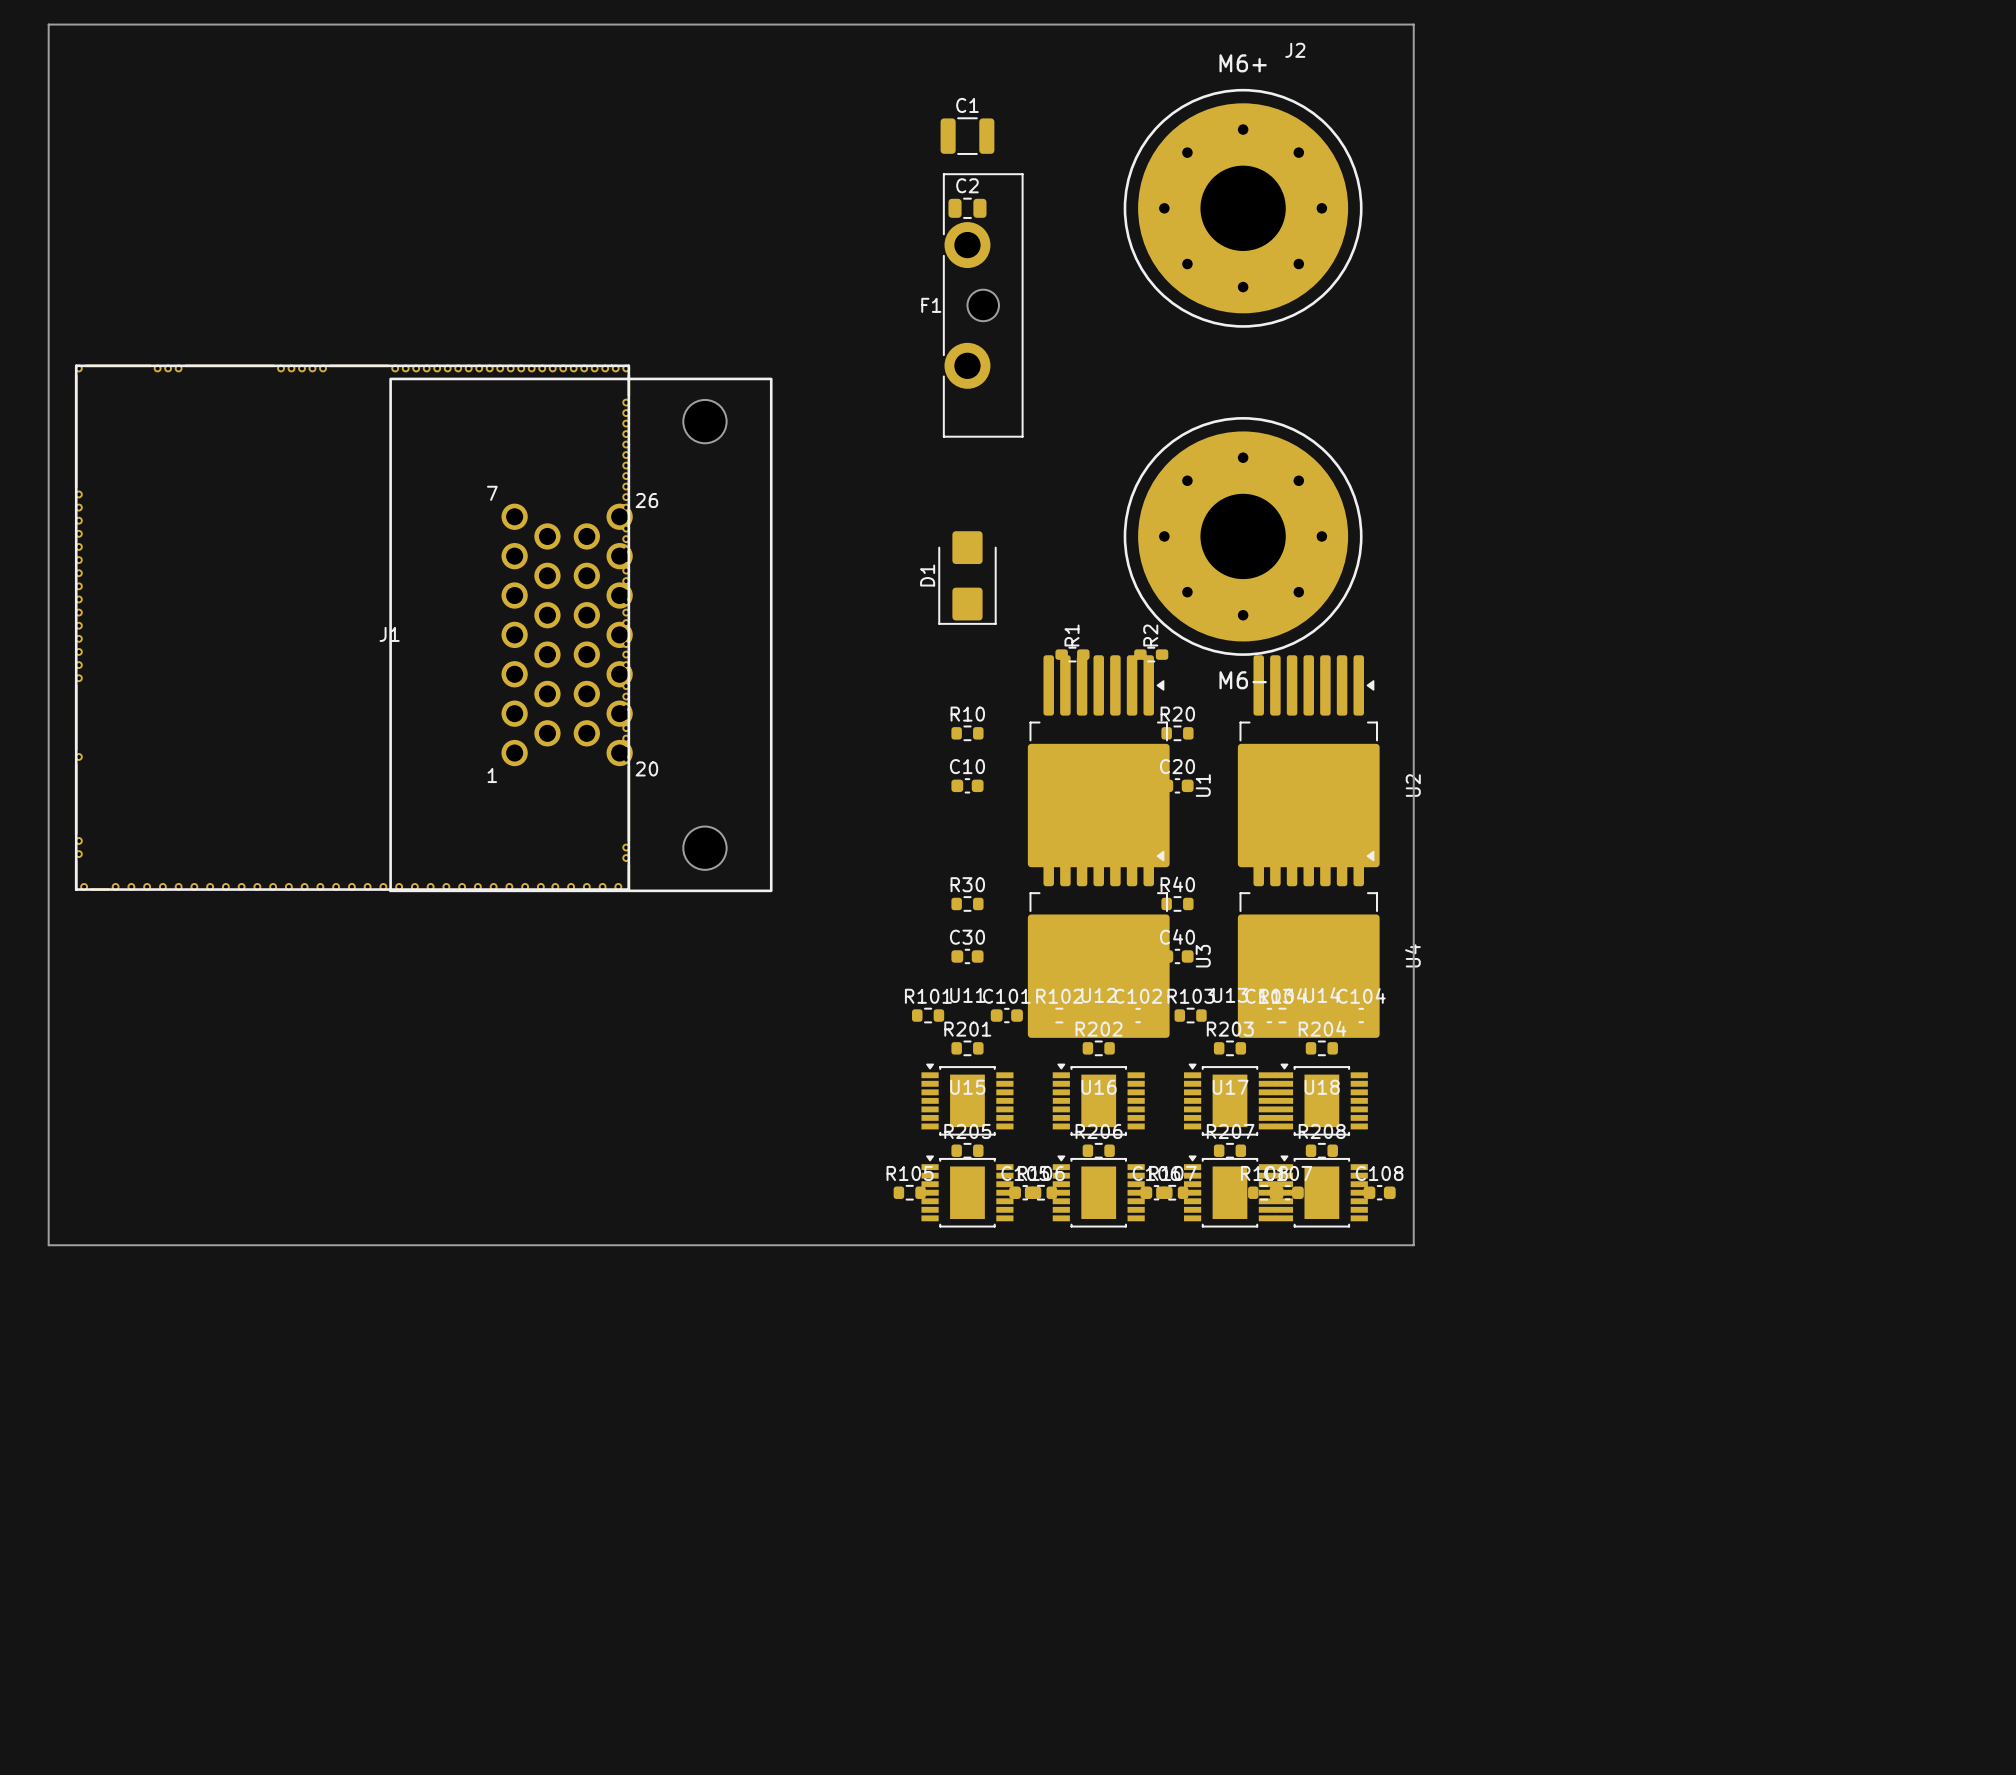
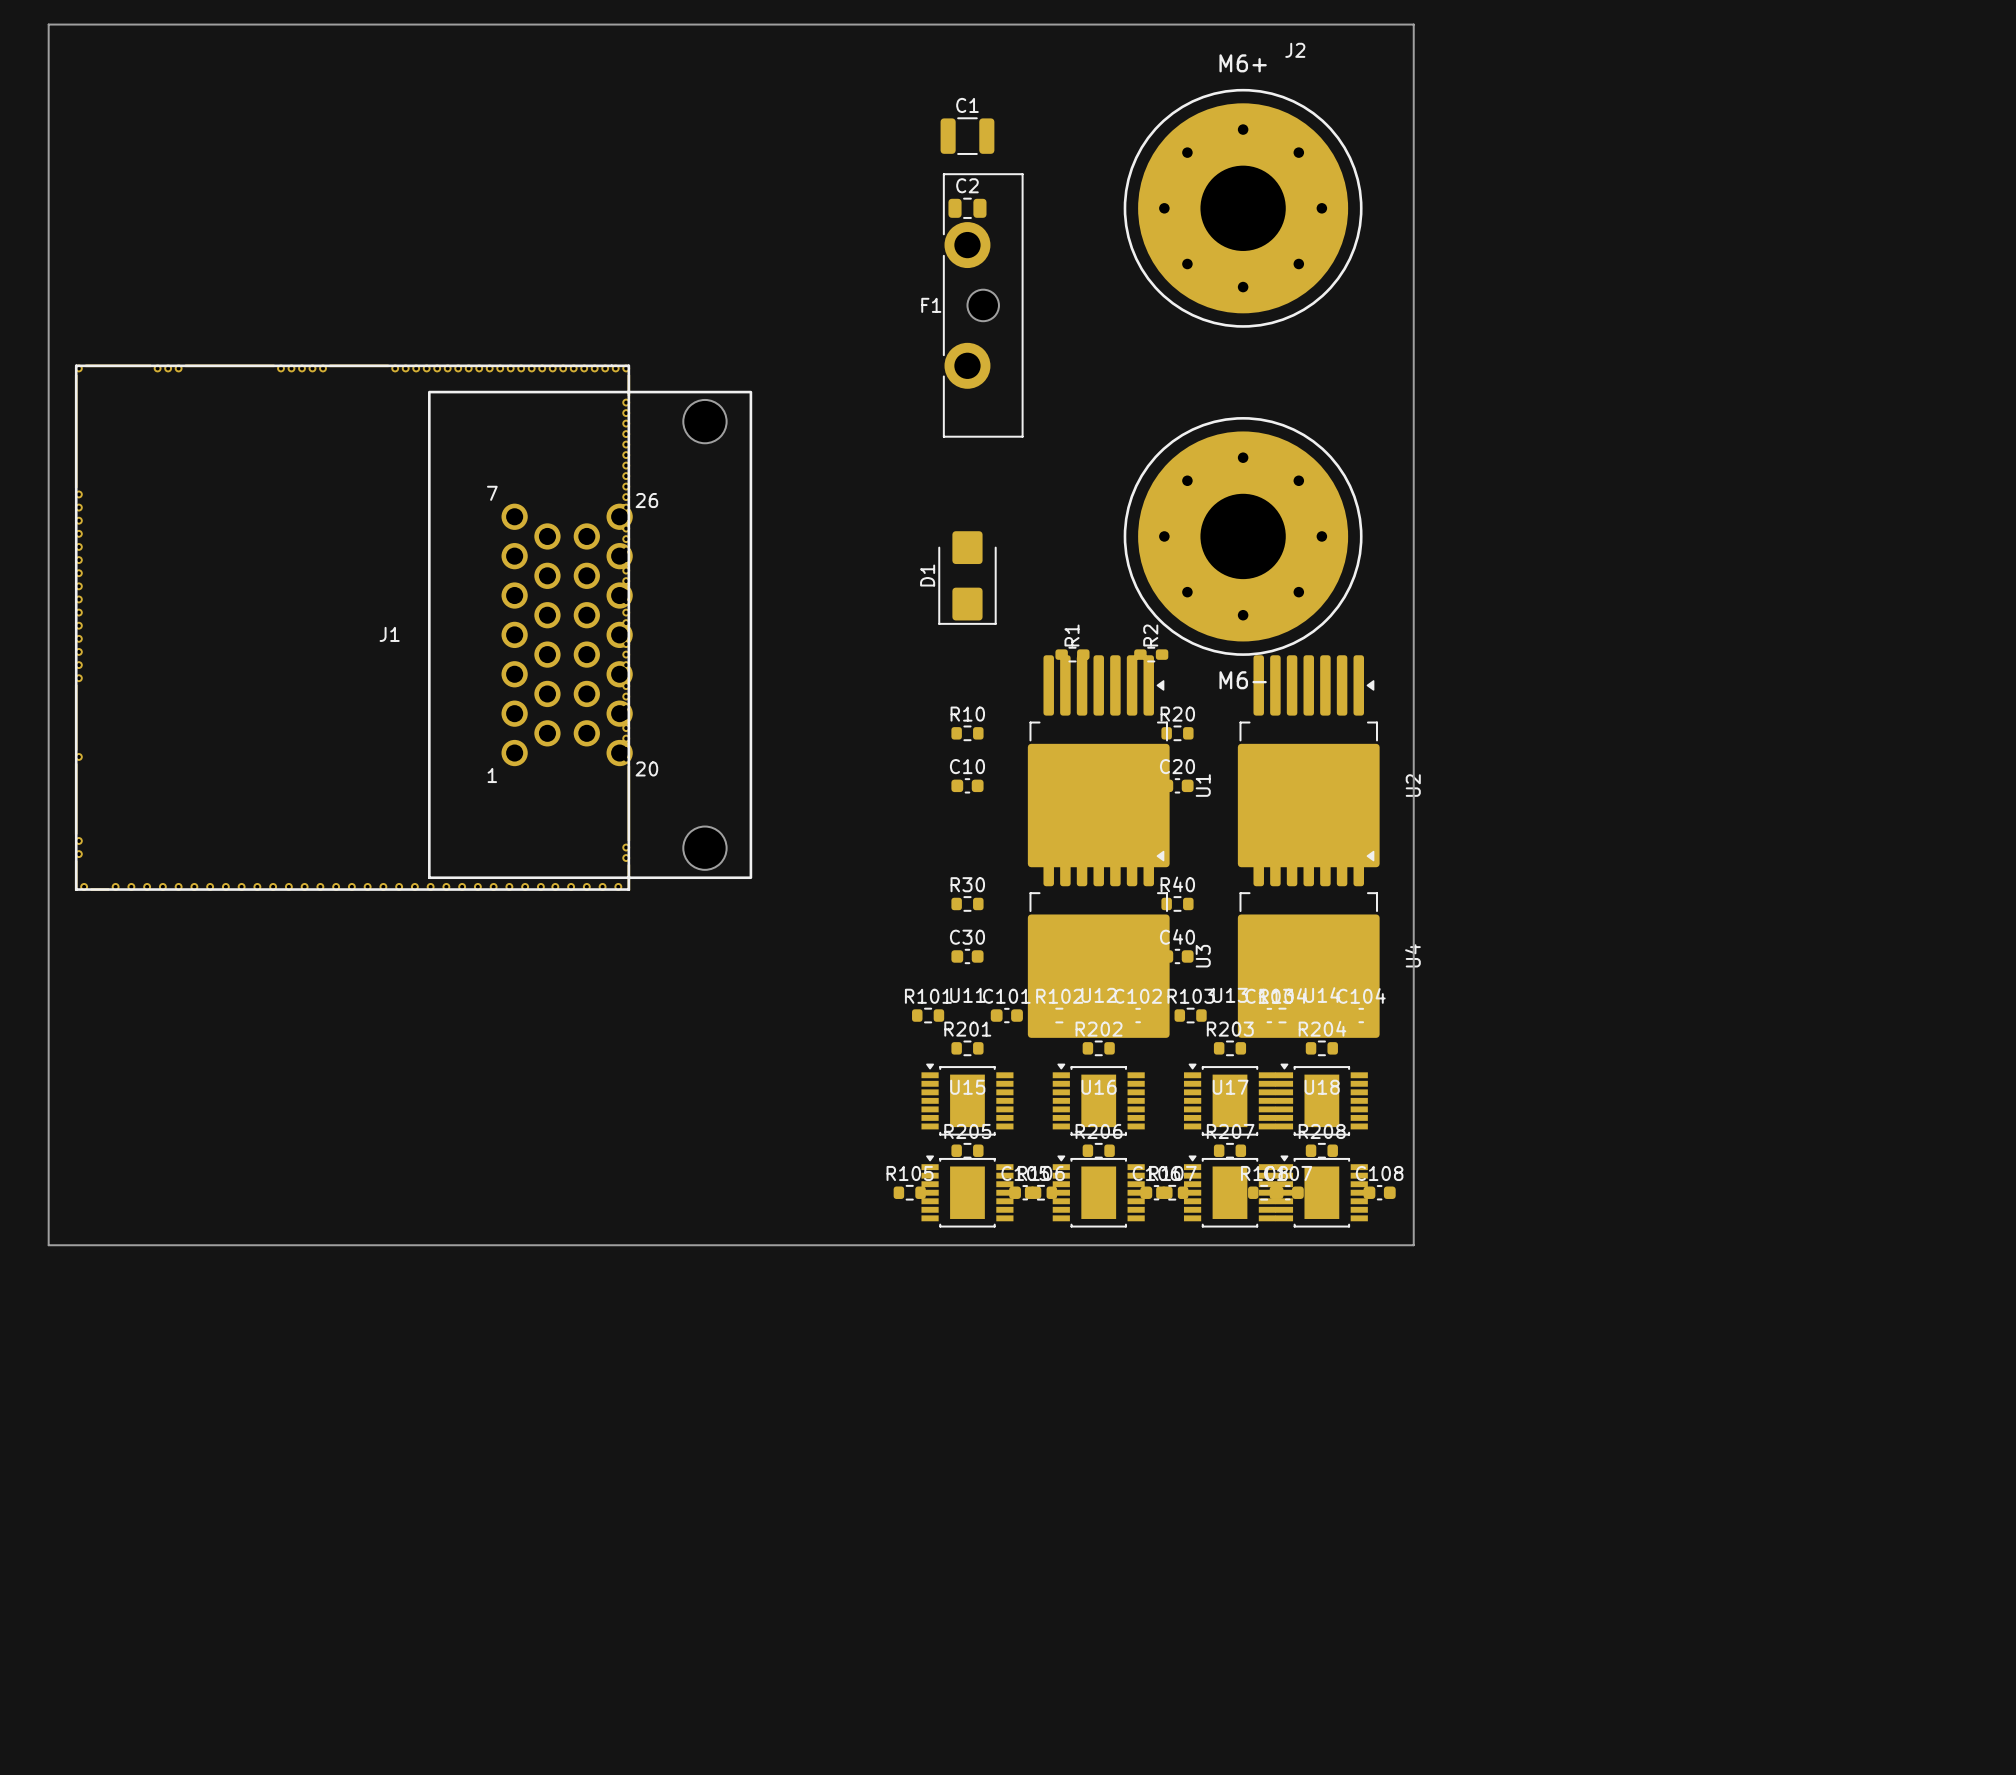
J1 footprint: [389, 377, 773, 893] -> [428, 390, 753, 880]

